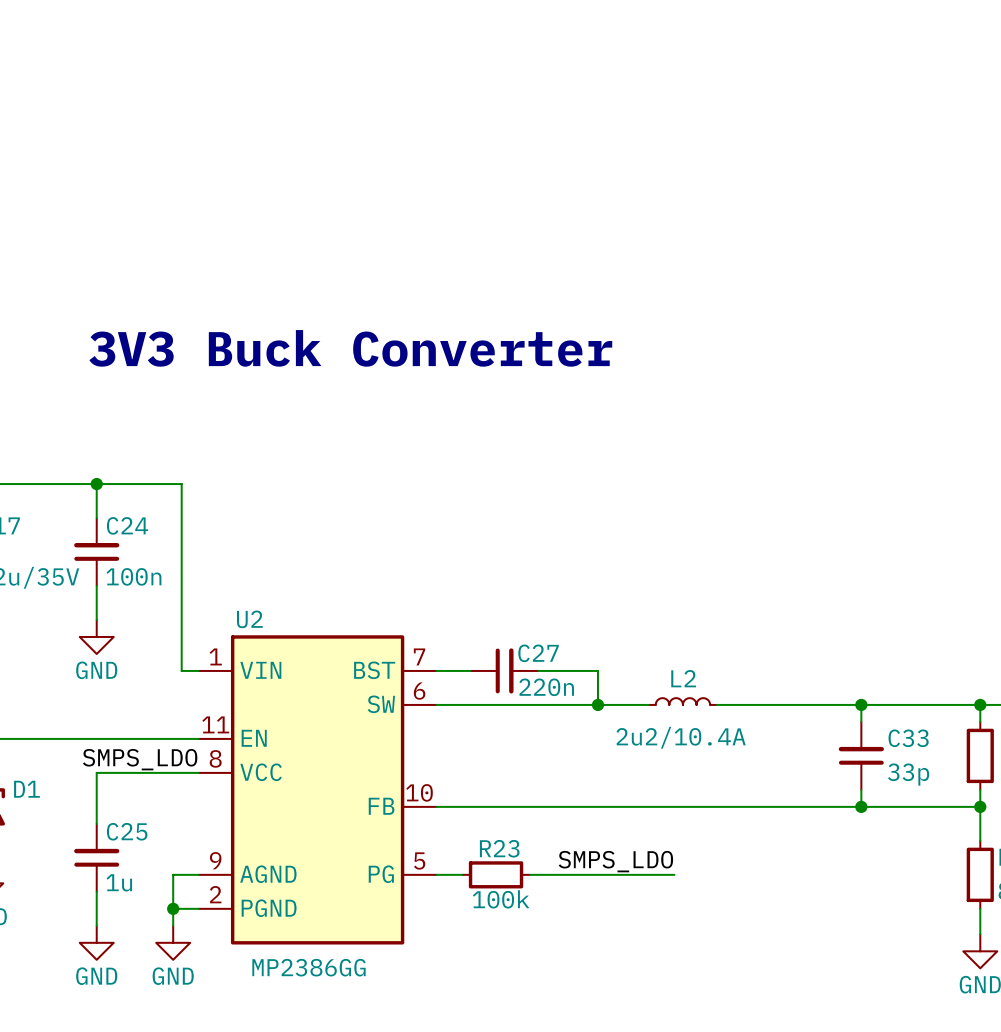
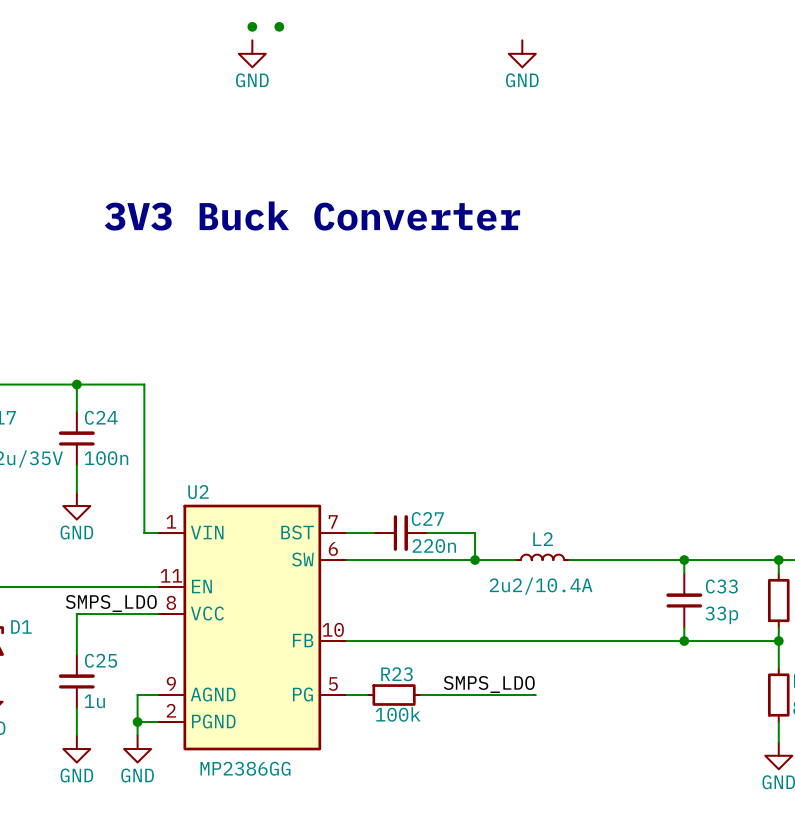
junction: none -> (252, 26)
junction: none -> (279, 26)
power symbol: none -> GND (252, 53)
power symbol: none -> GND (522, 53)
text position: 3V3 Buck Converter (350, 348) -> 3V3 Buck Converter (312, 216)

